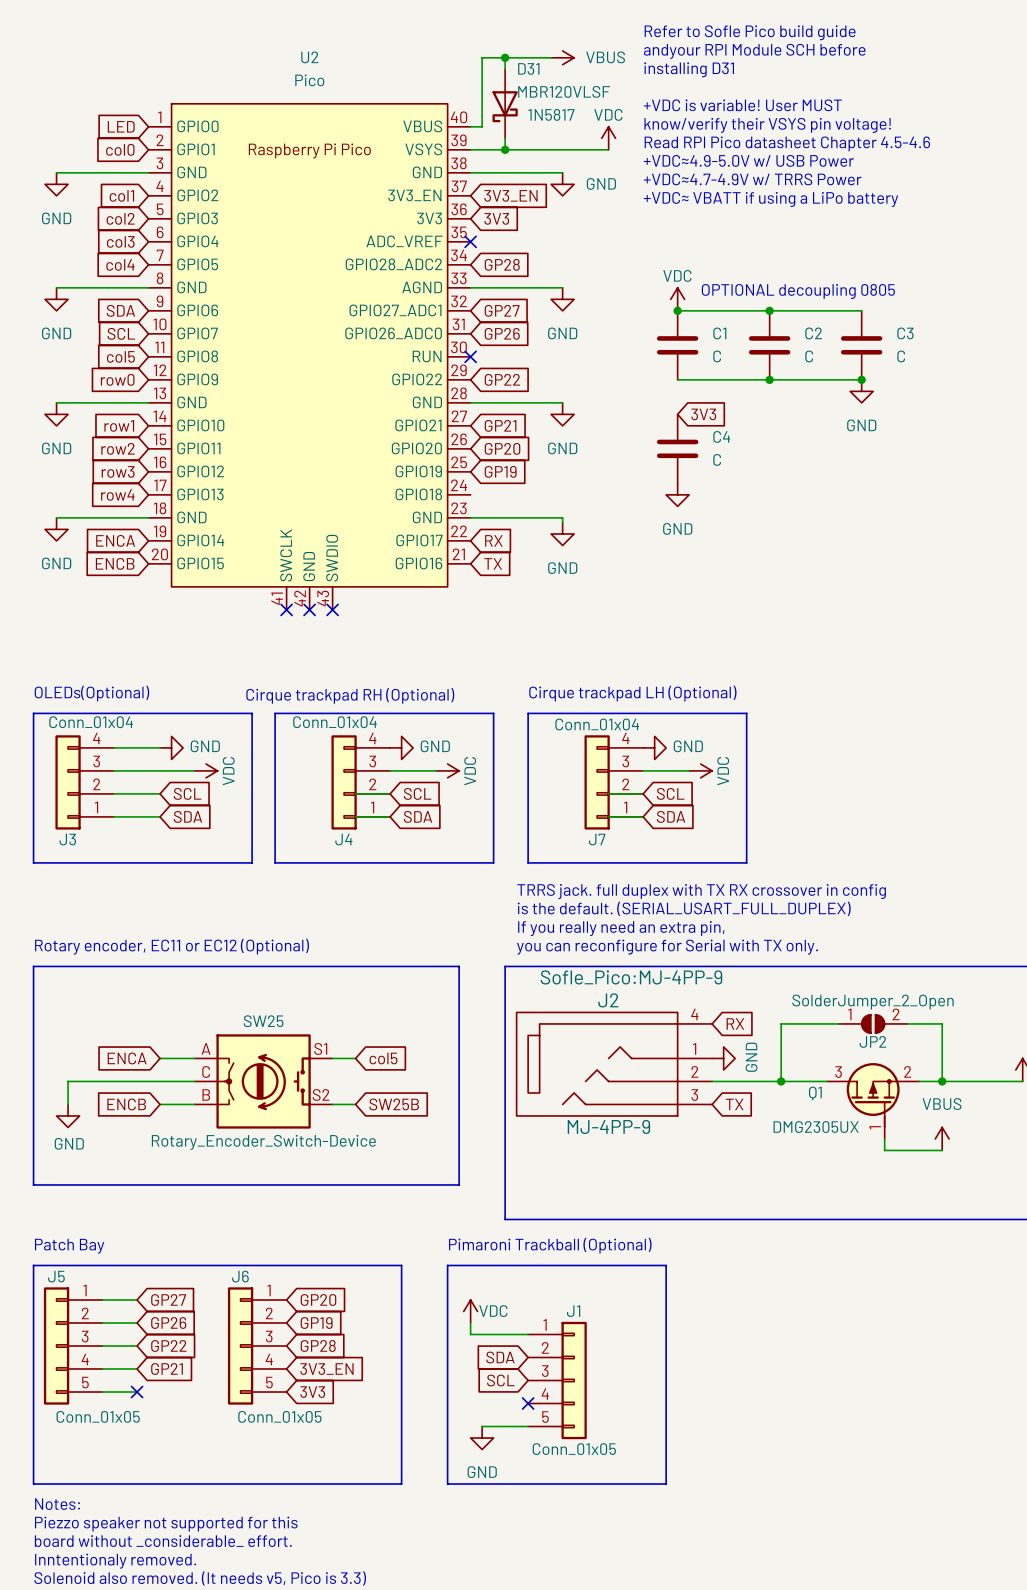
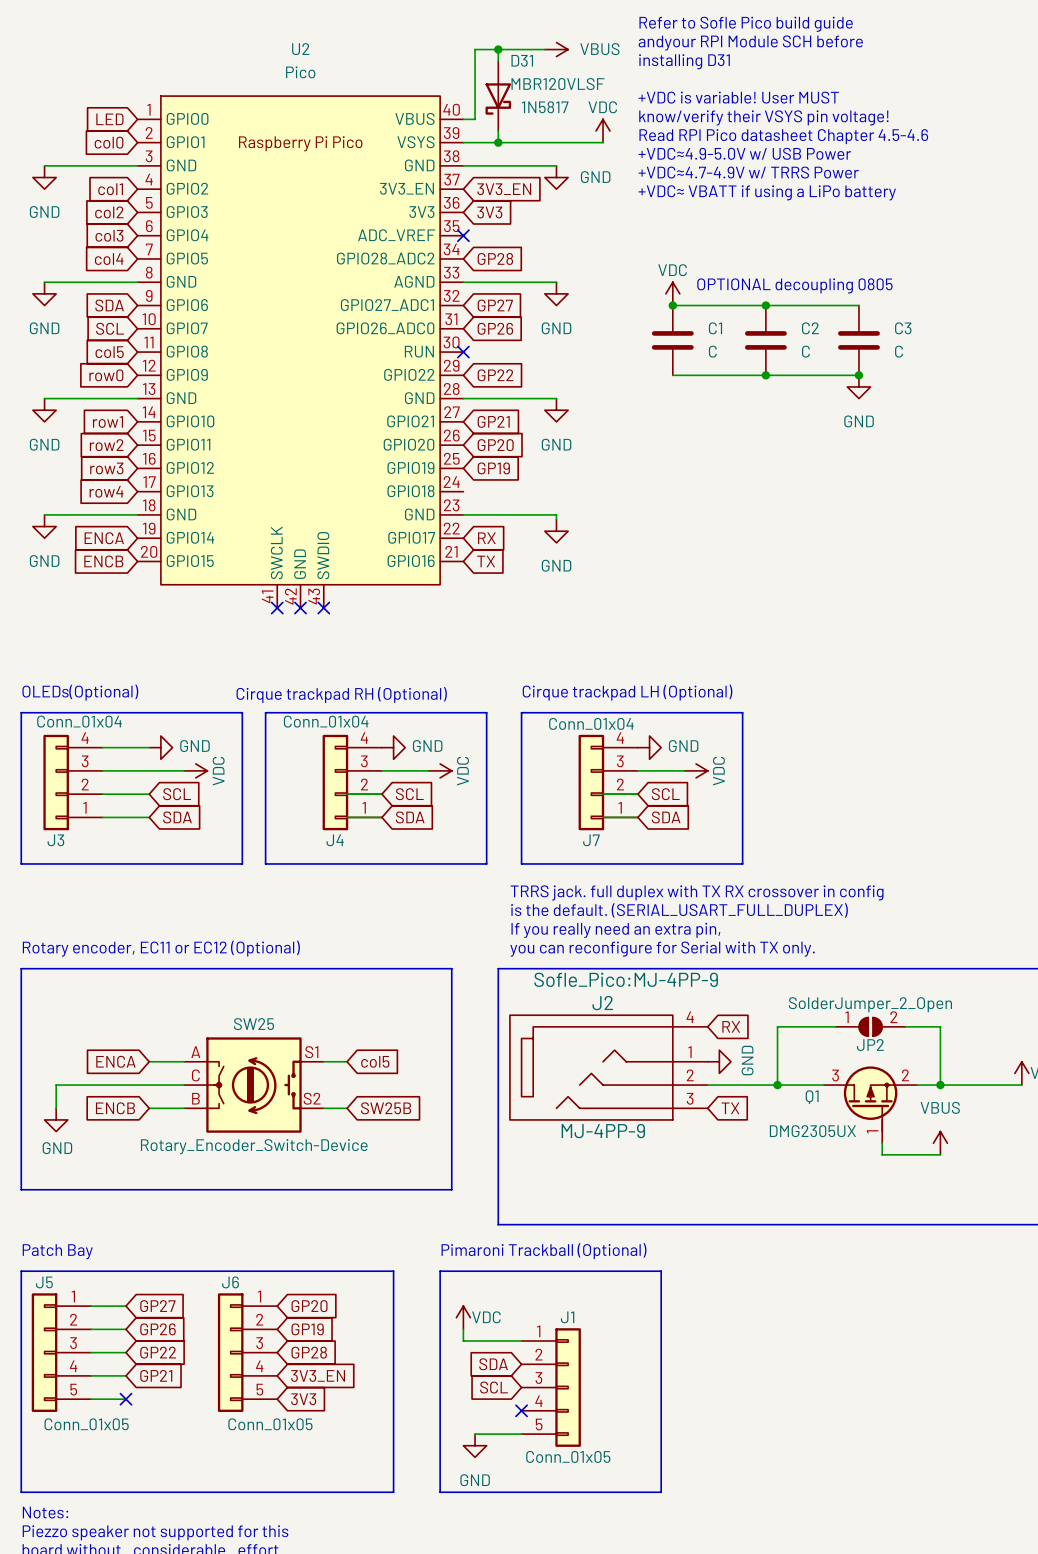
global label: 3V3 (703, 414) -> none
C4: C (677, 448) -> none
power symbol: GND (677, 494) -> none

